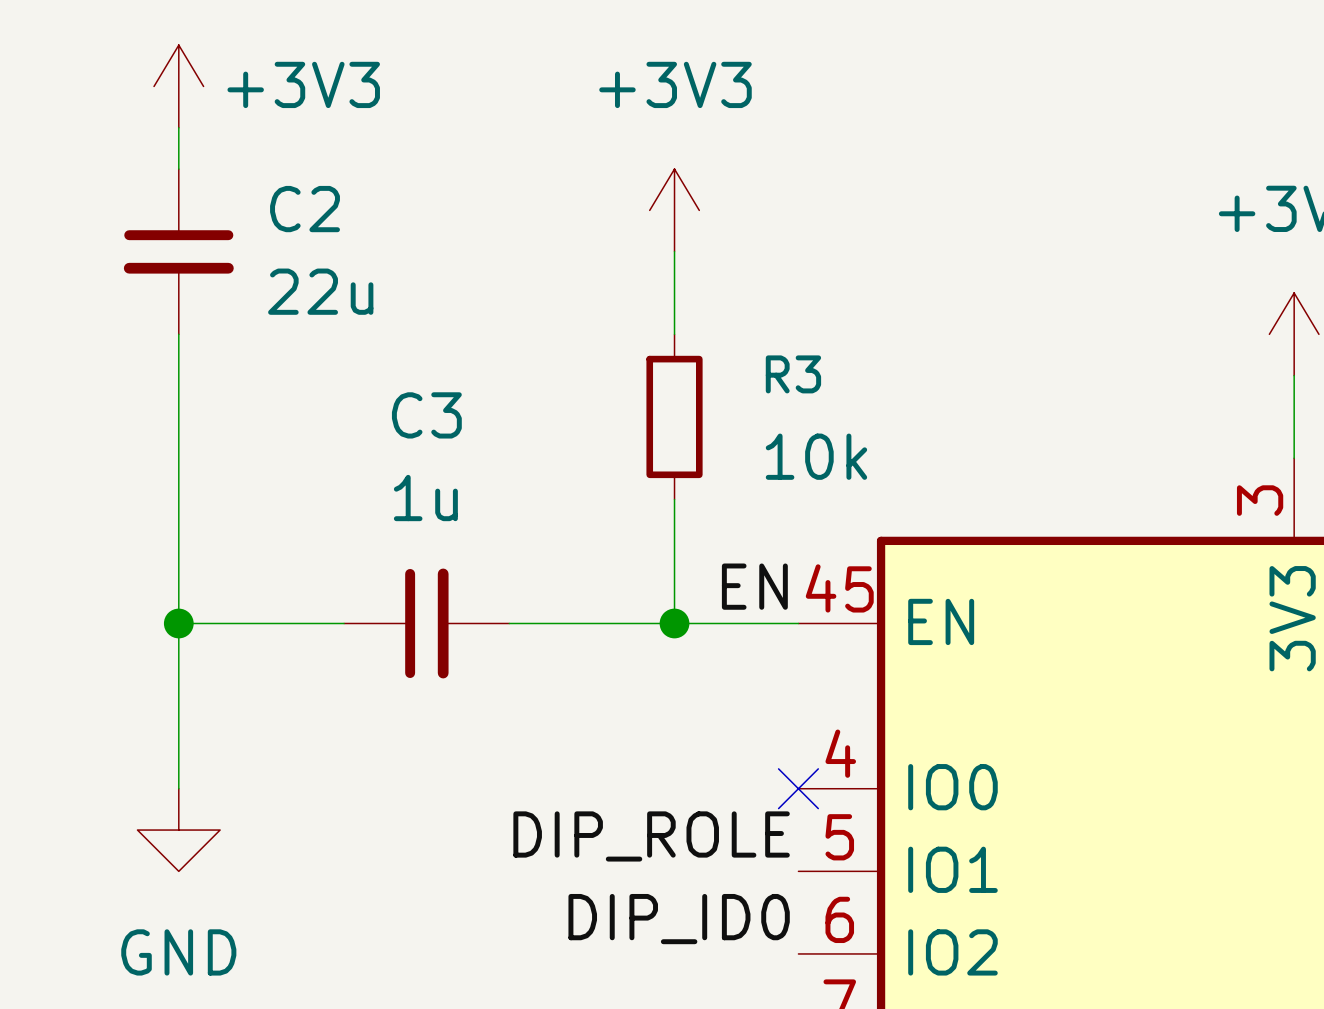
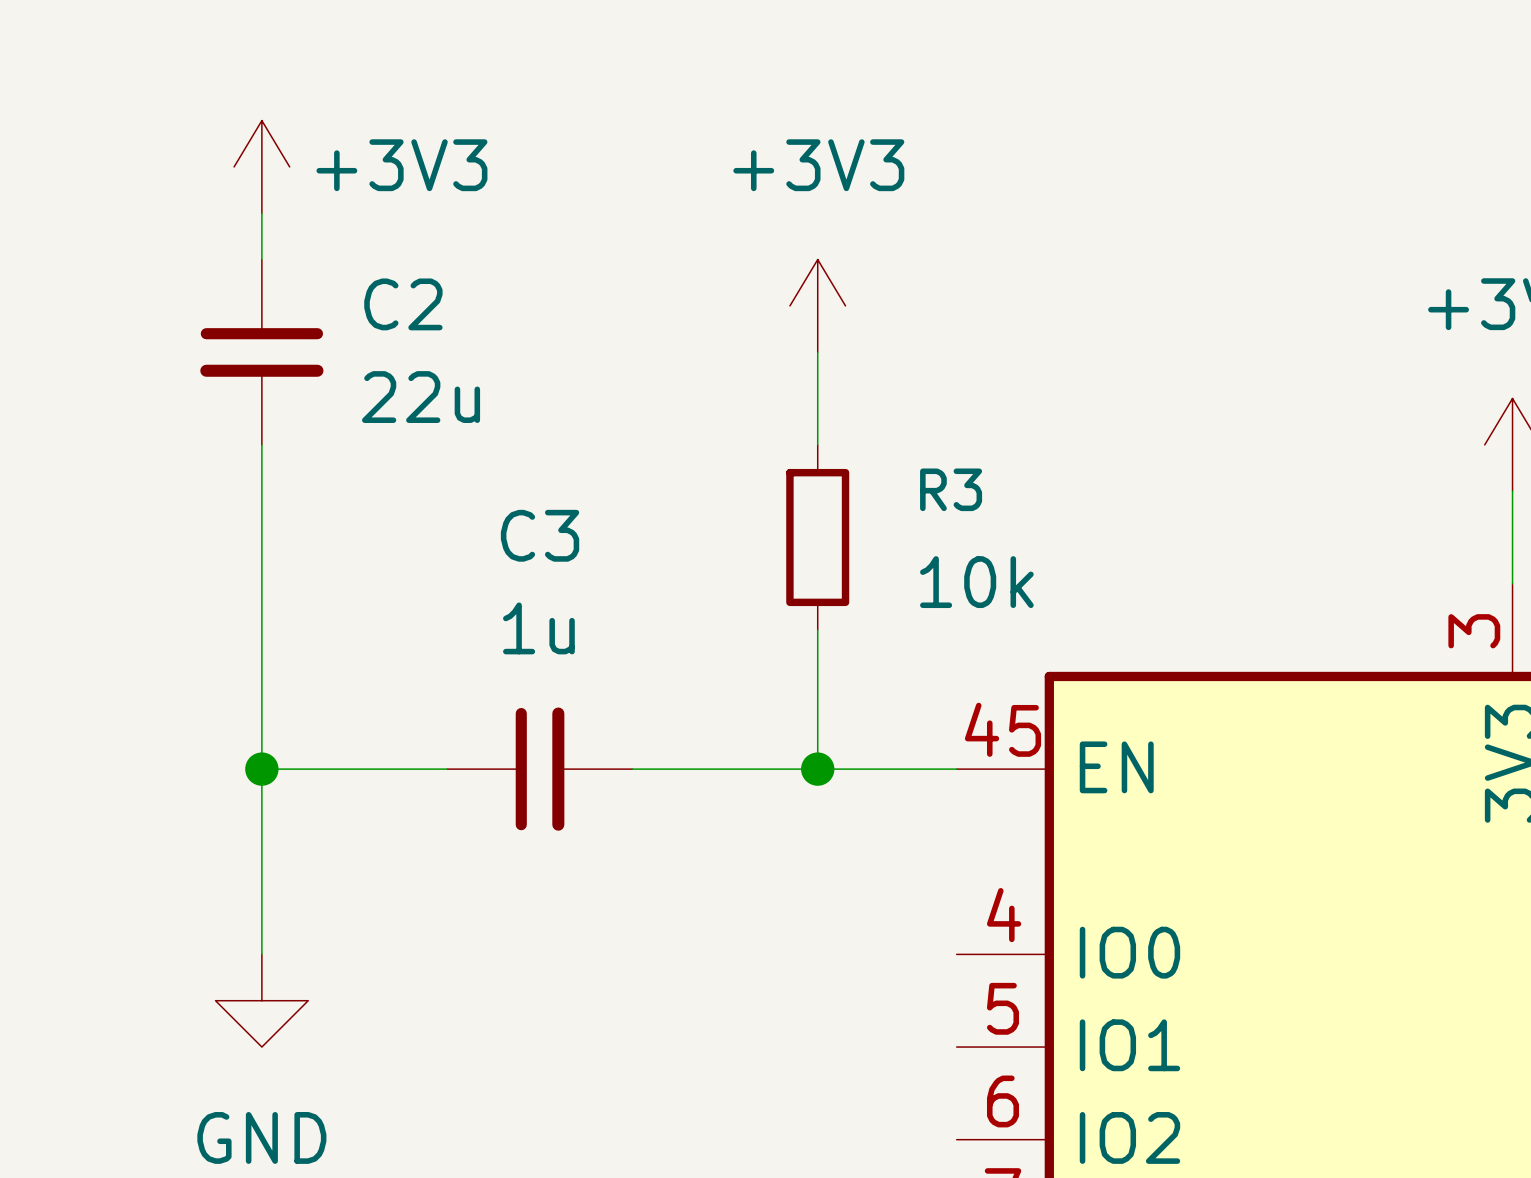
label: EN (754, 586) -> none
no-connect mark: (798, 788) -> none
label: DIP_ROLE (651, 836) -> none
label: DIP_ID0 (679, 919) -> none

